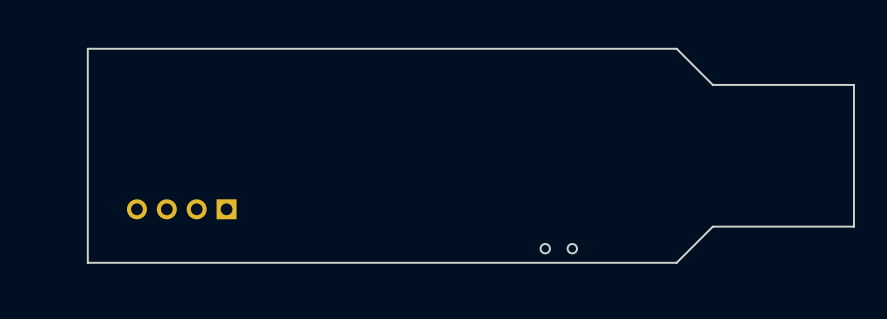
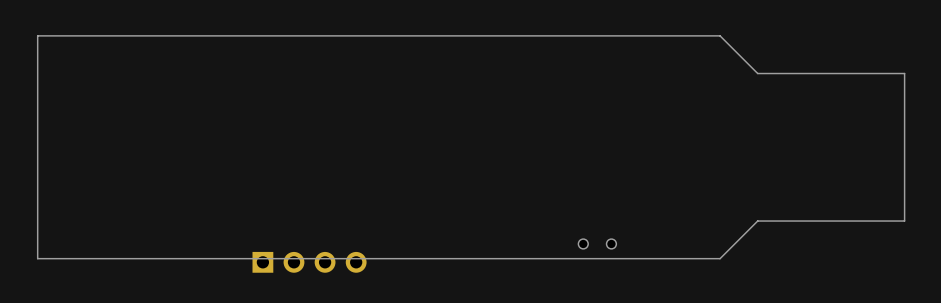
board edge: (87, 48) (87, 262) -> (107, 35) (37, 35) (37, 258) (107, 258)
part rotation: 0° (181, 209) -> 180° (309, 262)
part position: (181, 209) -> (309, 262)

